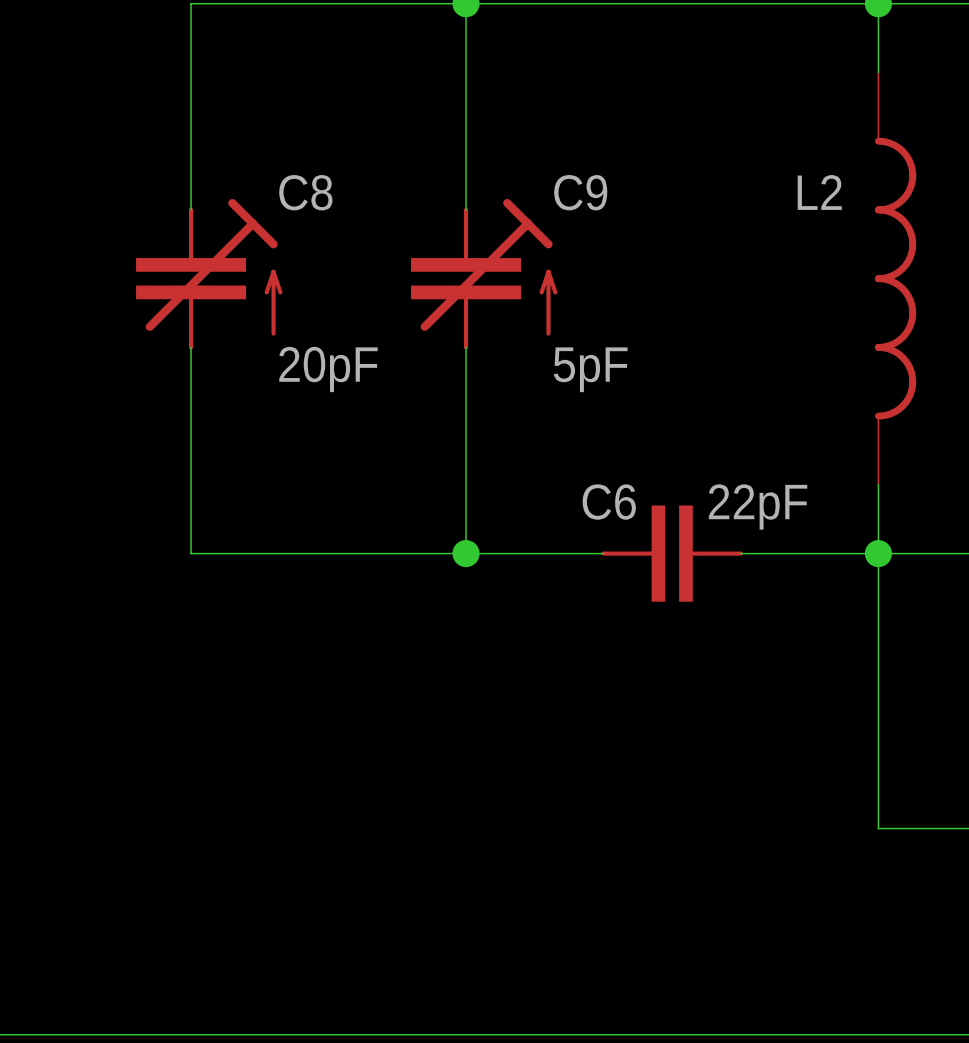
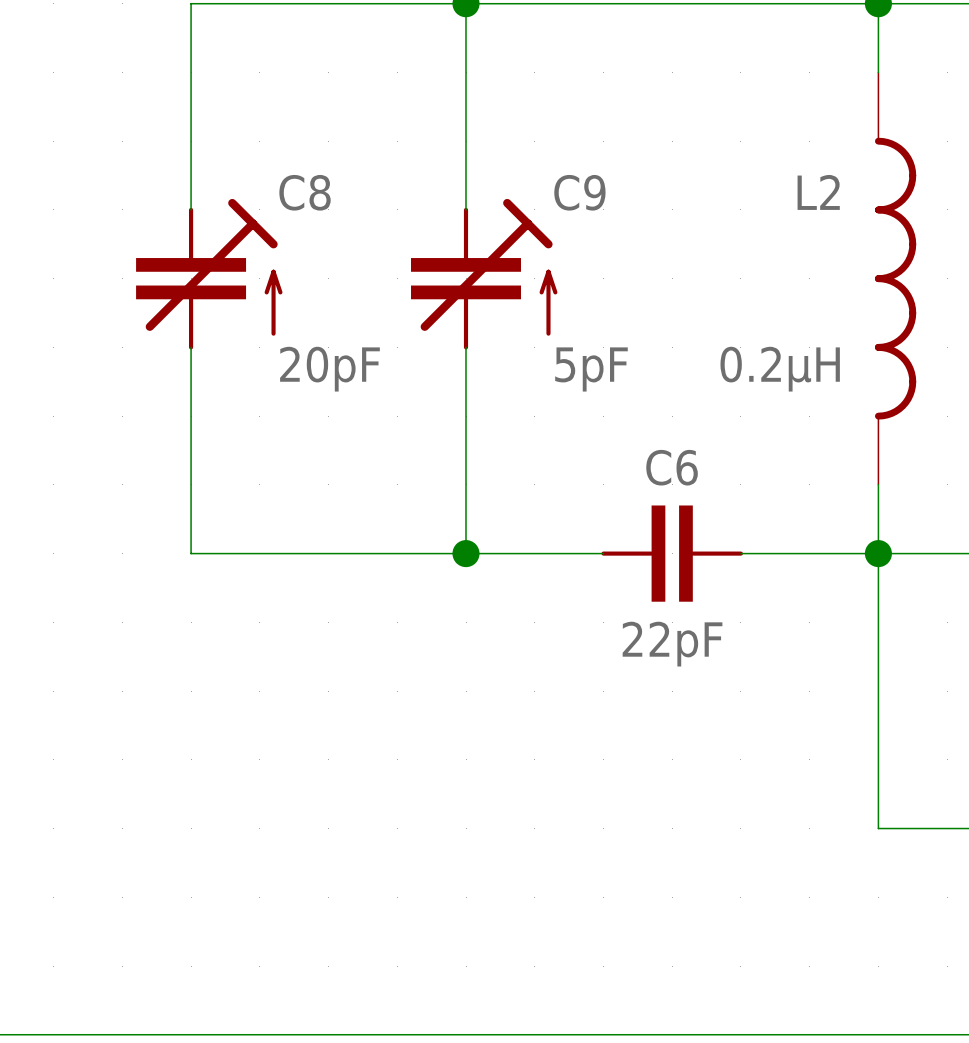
L2 value: none -> 0.2μH (780, 369)
C6 name position: C6 (609, 502) -> C6 (672, 467)
C6 value position: 22pF (758, 506) -> 22pF (672, 644)

